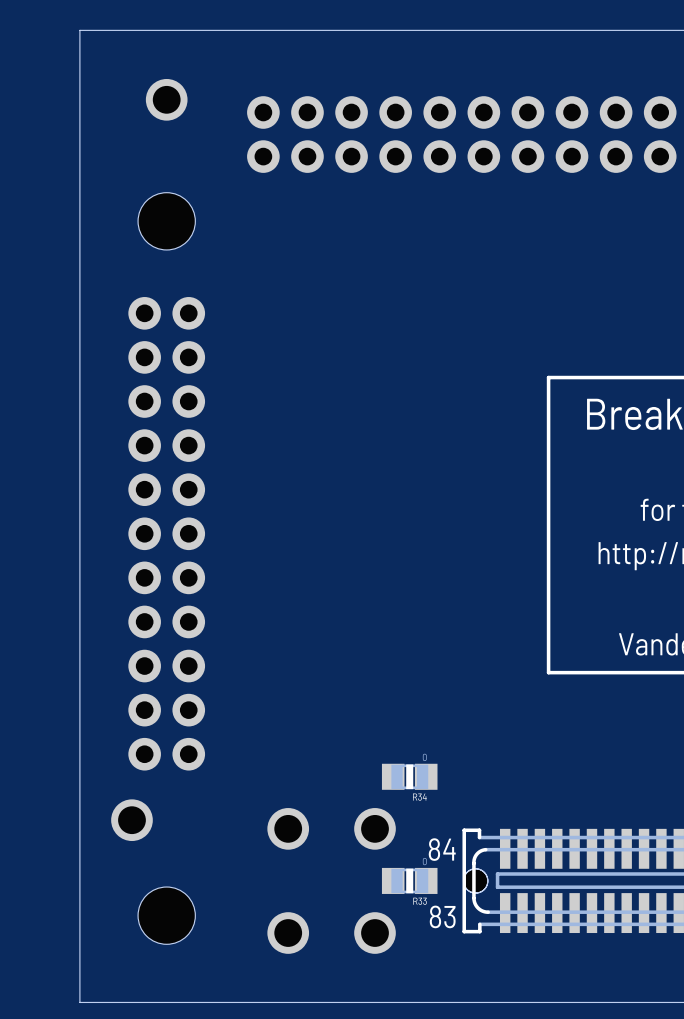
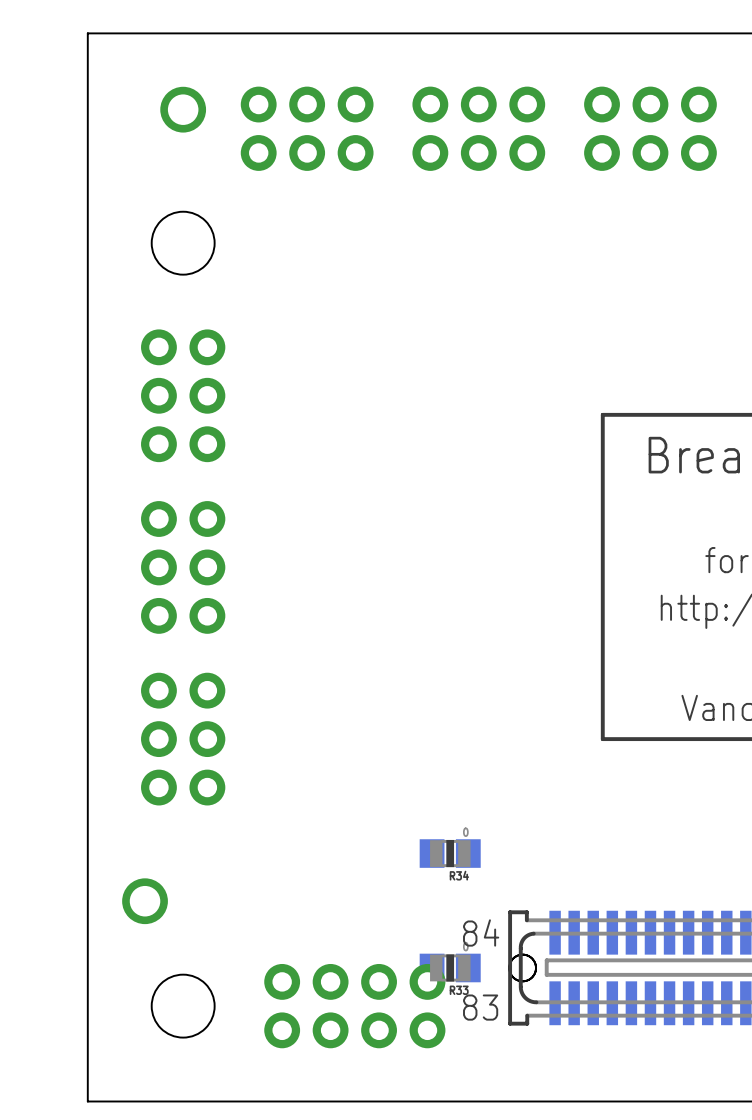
part: none -> (307, 128)
part: none -> (478, 128)
part: none -> (650, 128)
part: (461, 134) -> none
part footprint: [128, 297, 206, 771] -> [141, 501, 226, 634]
part: none -> (183, 395)
part: none -> (183, 739)
part: (288, 828) -> none
part: (375, 828) -> none
part: none -> (354, 1006)
part: (288, 933) -> none
part: (375, 933) -> none

